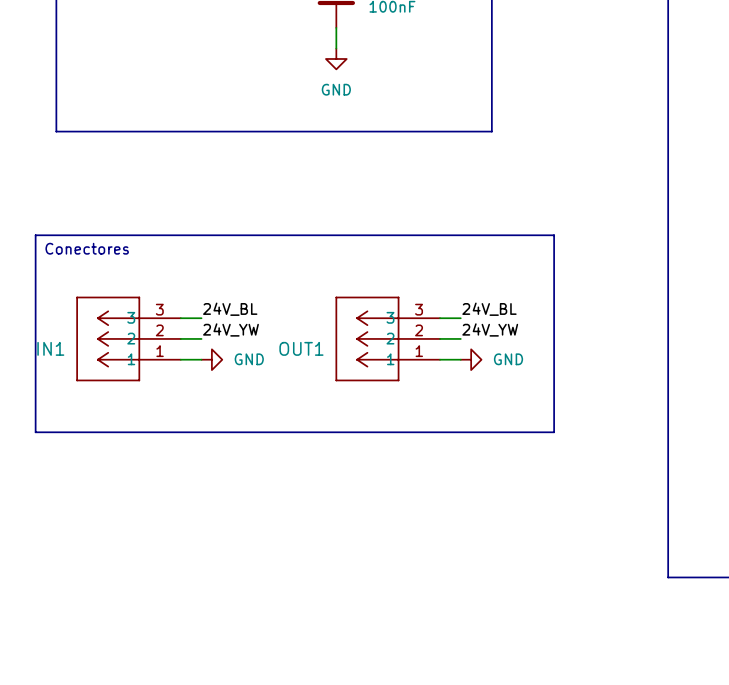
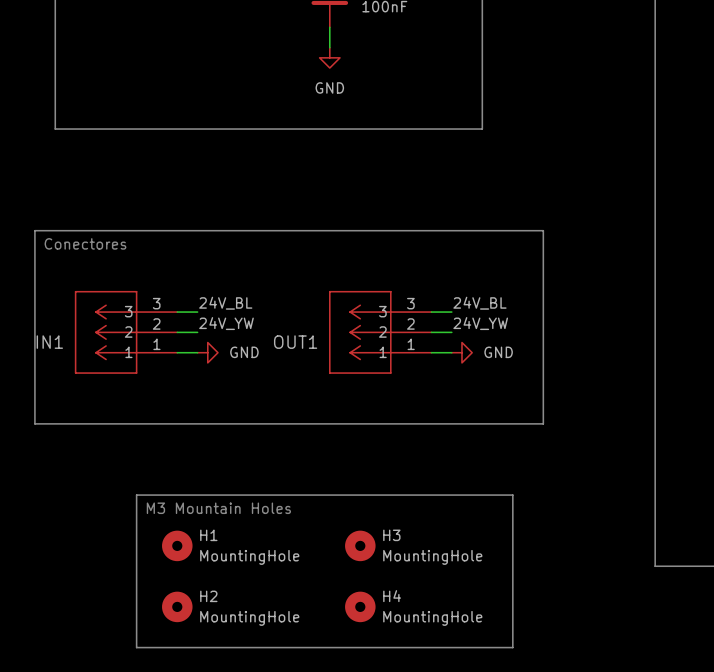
line: none -> (136, 495) (512, 495) (512, 647) (136, 647) (136, 495)
text: none -> M3 Mountain Holes (218, 508)
H1: none -> MountingHole (177, 545)
H3: none -> MountingHole (360, 545)
H2: none -> MountingHole (177, 606)
H4: none -> MountingHole (360, 606)

